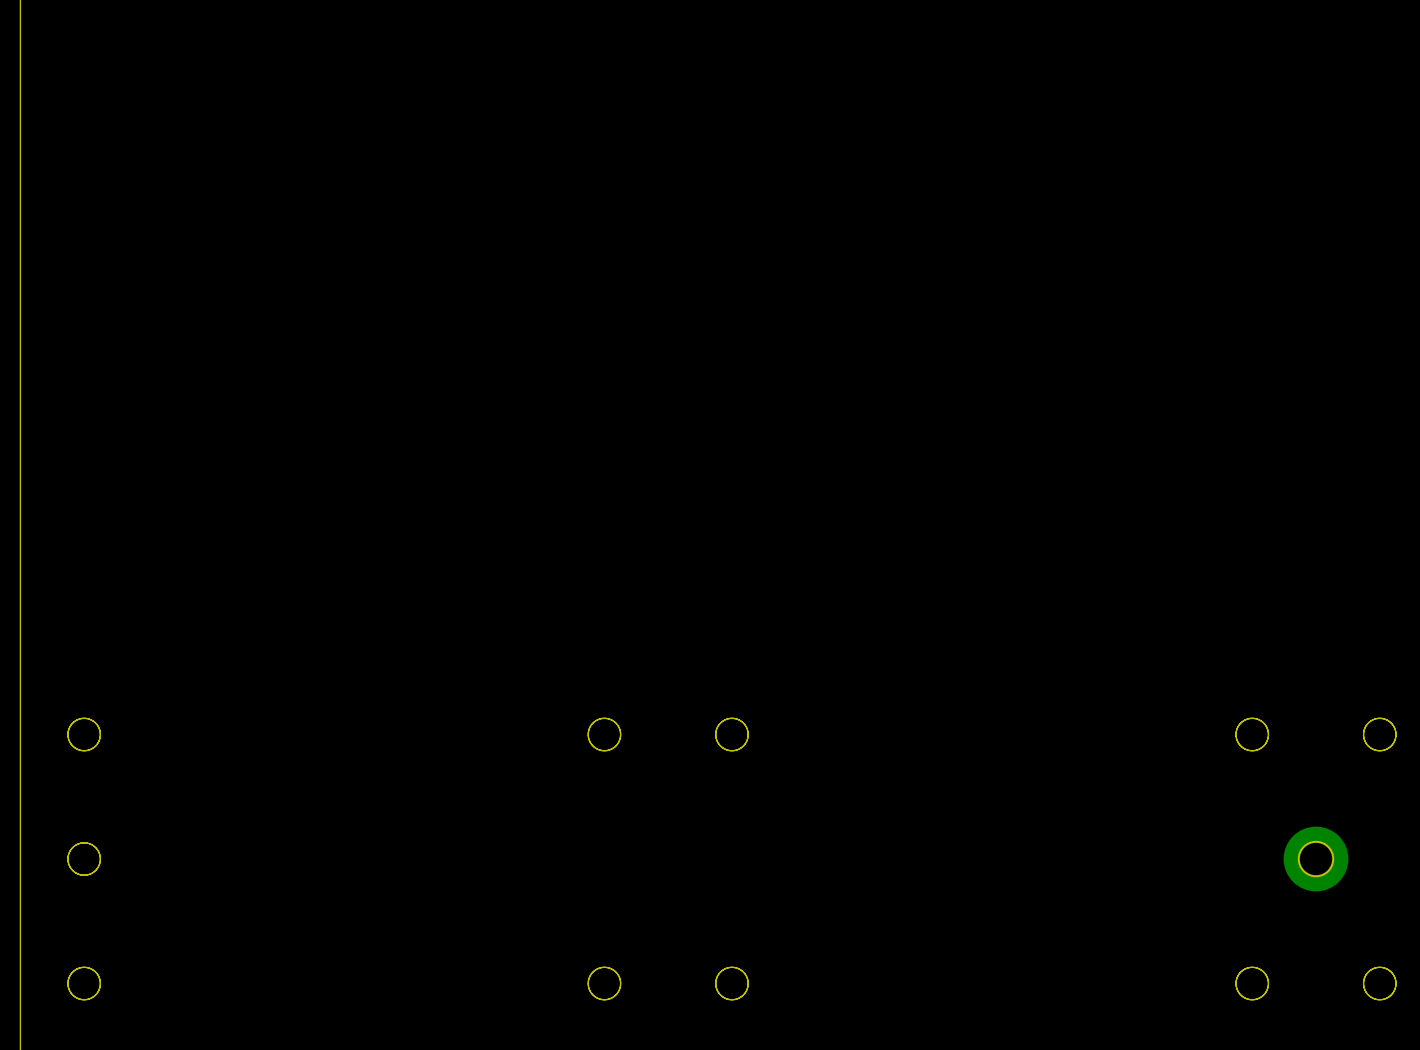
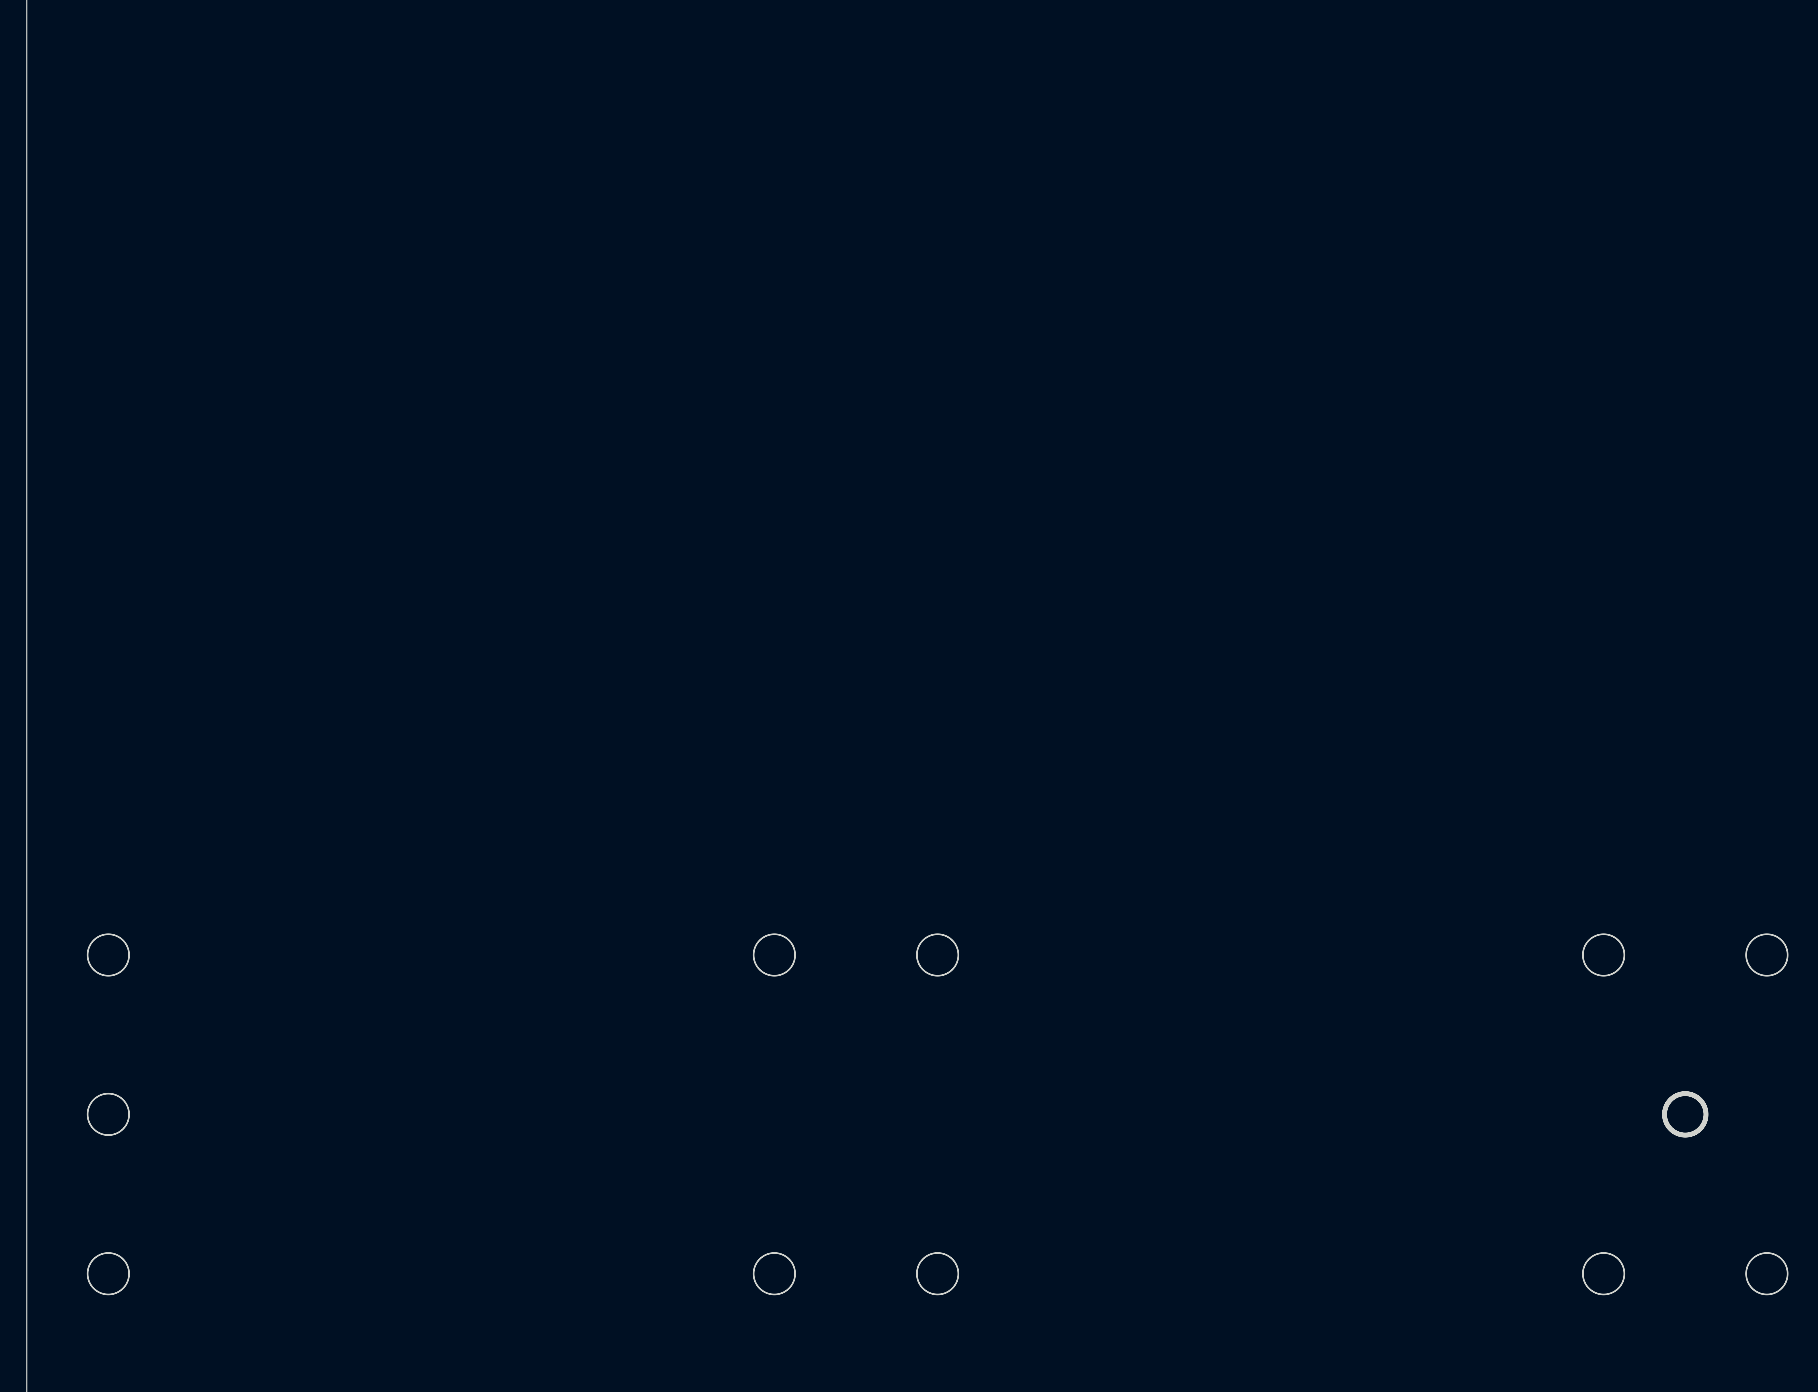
board edge: none -> (1686, 1093) (1694, 1095) (1700, 1100) (1704, 1107) (1705, 1115) (1703, 1123) (1699, 1129) (1692, 1133) (1684, 1135) (1676, 1133) (1669, 1128) (1665, 1121) (1664, 1113) (1666, 1105) (1671, 1099) (1678, 1094) (1686, 1093)
part: (1316, 859) -> none

